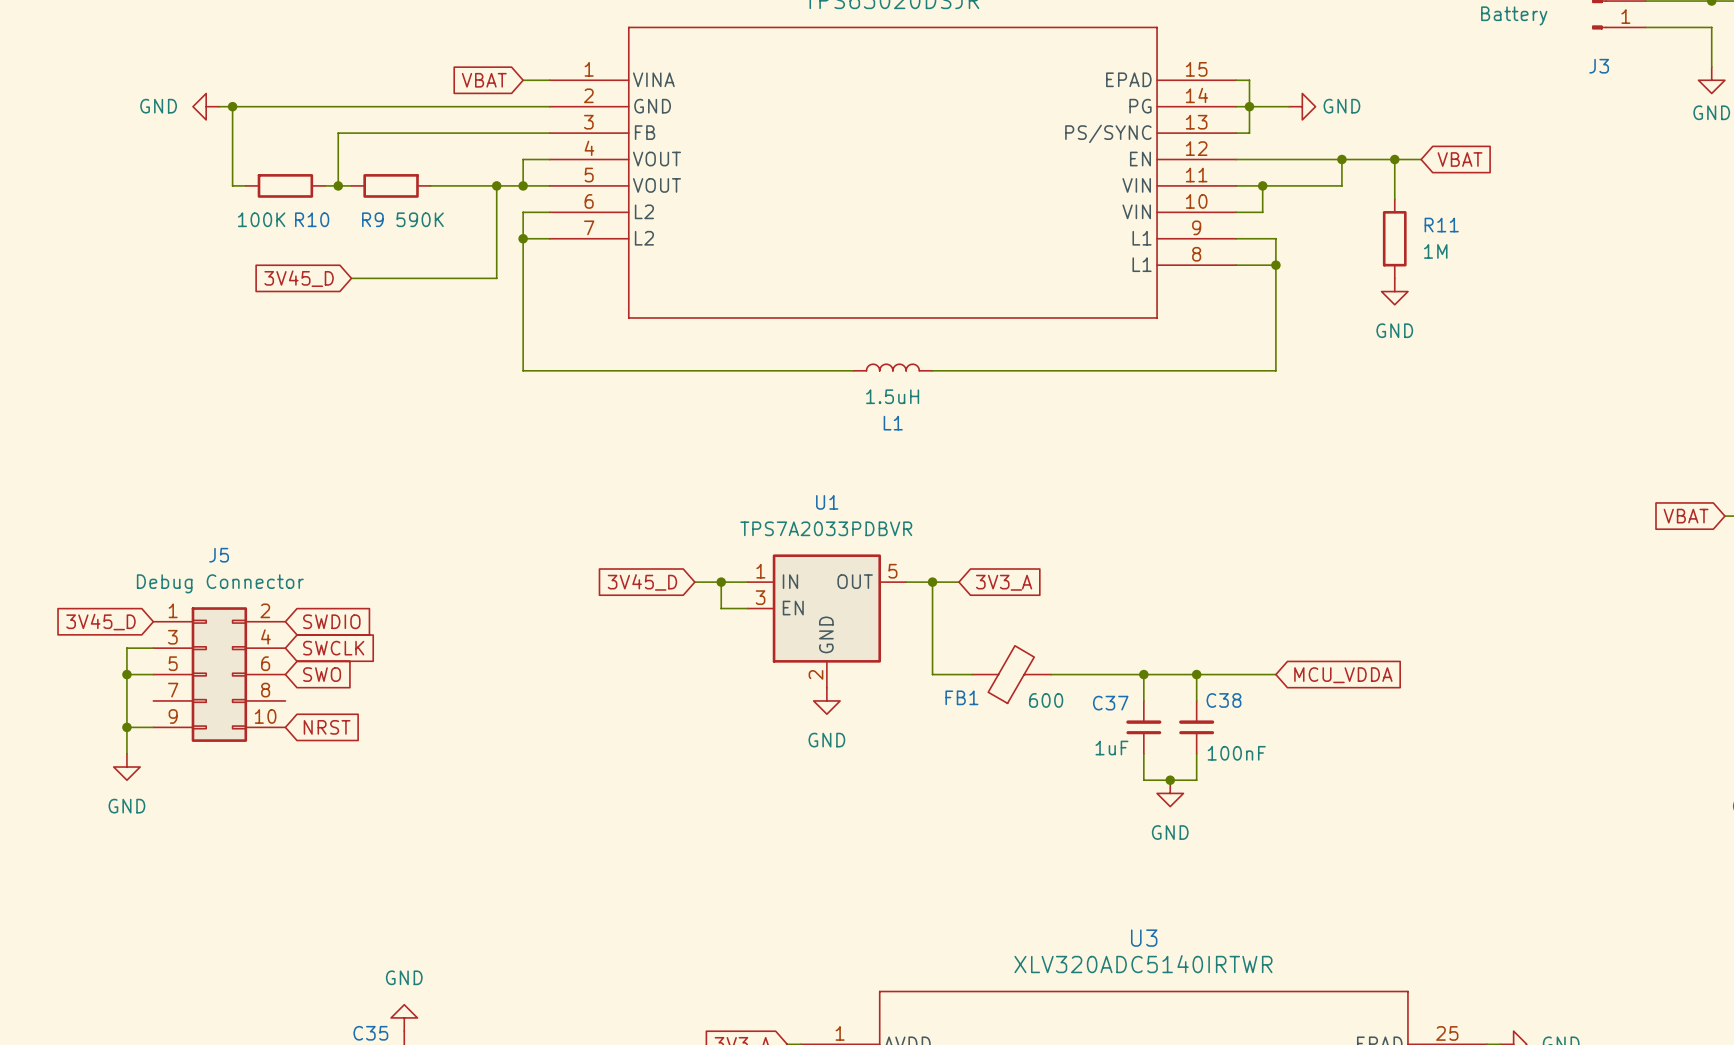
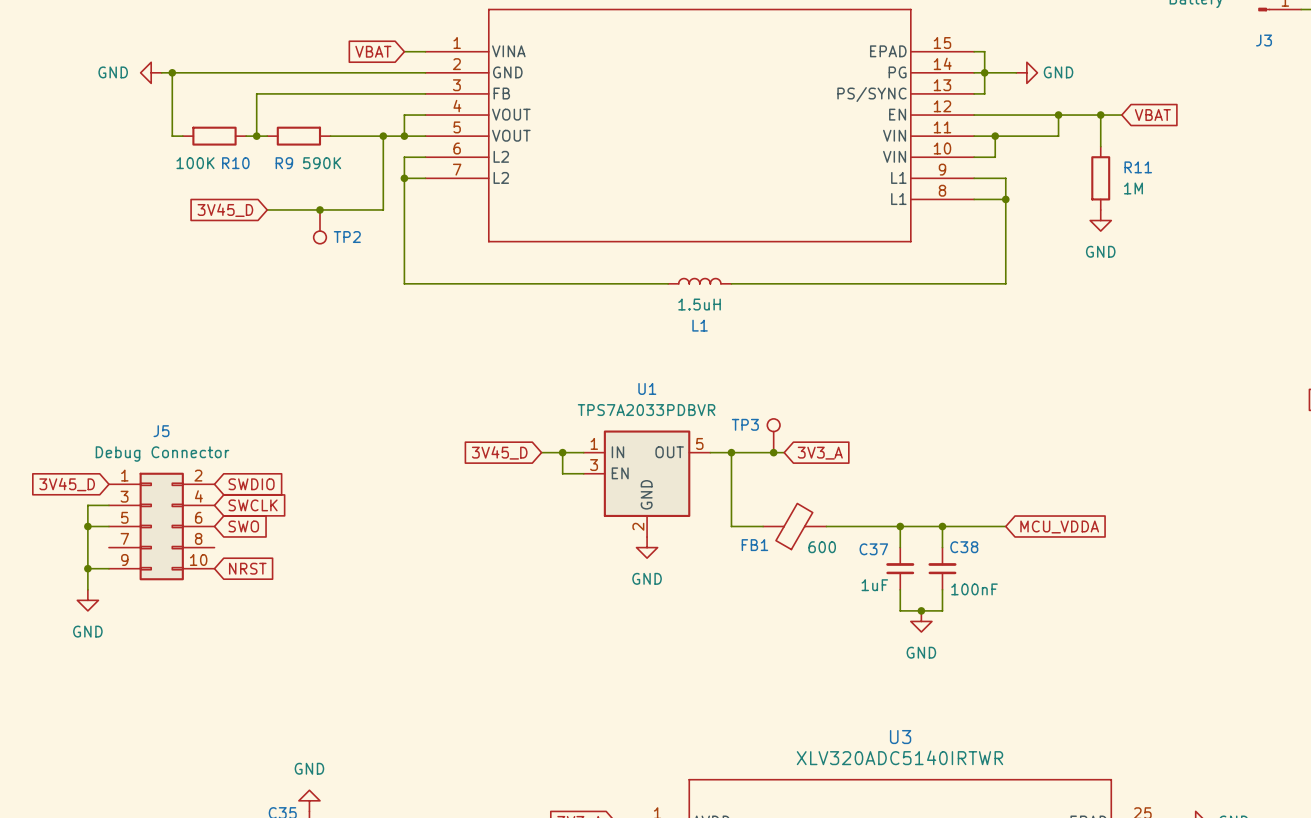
junction: none -> (320, 209)
TP2: none -> (320, 226)
TP3: none -> (773, 435)
wire: none -> (752, 452) (784, 452)
junction: none -> (773, 452)
global label position: 3V3_A (1004, 582) -> 3V3_A (820, 453)

